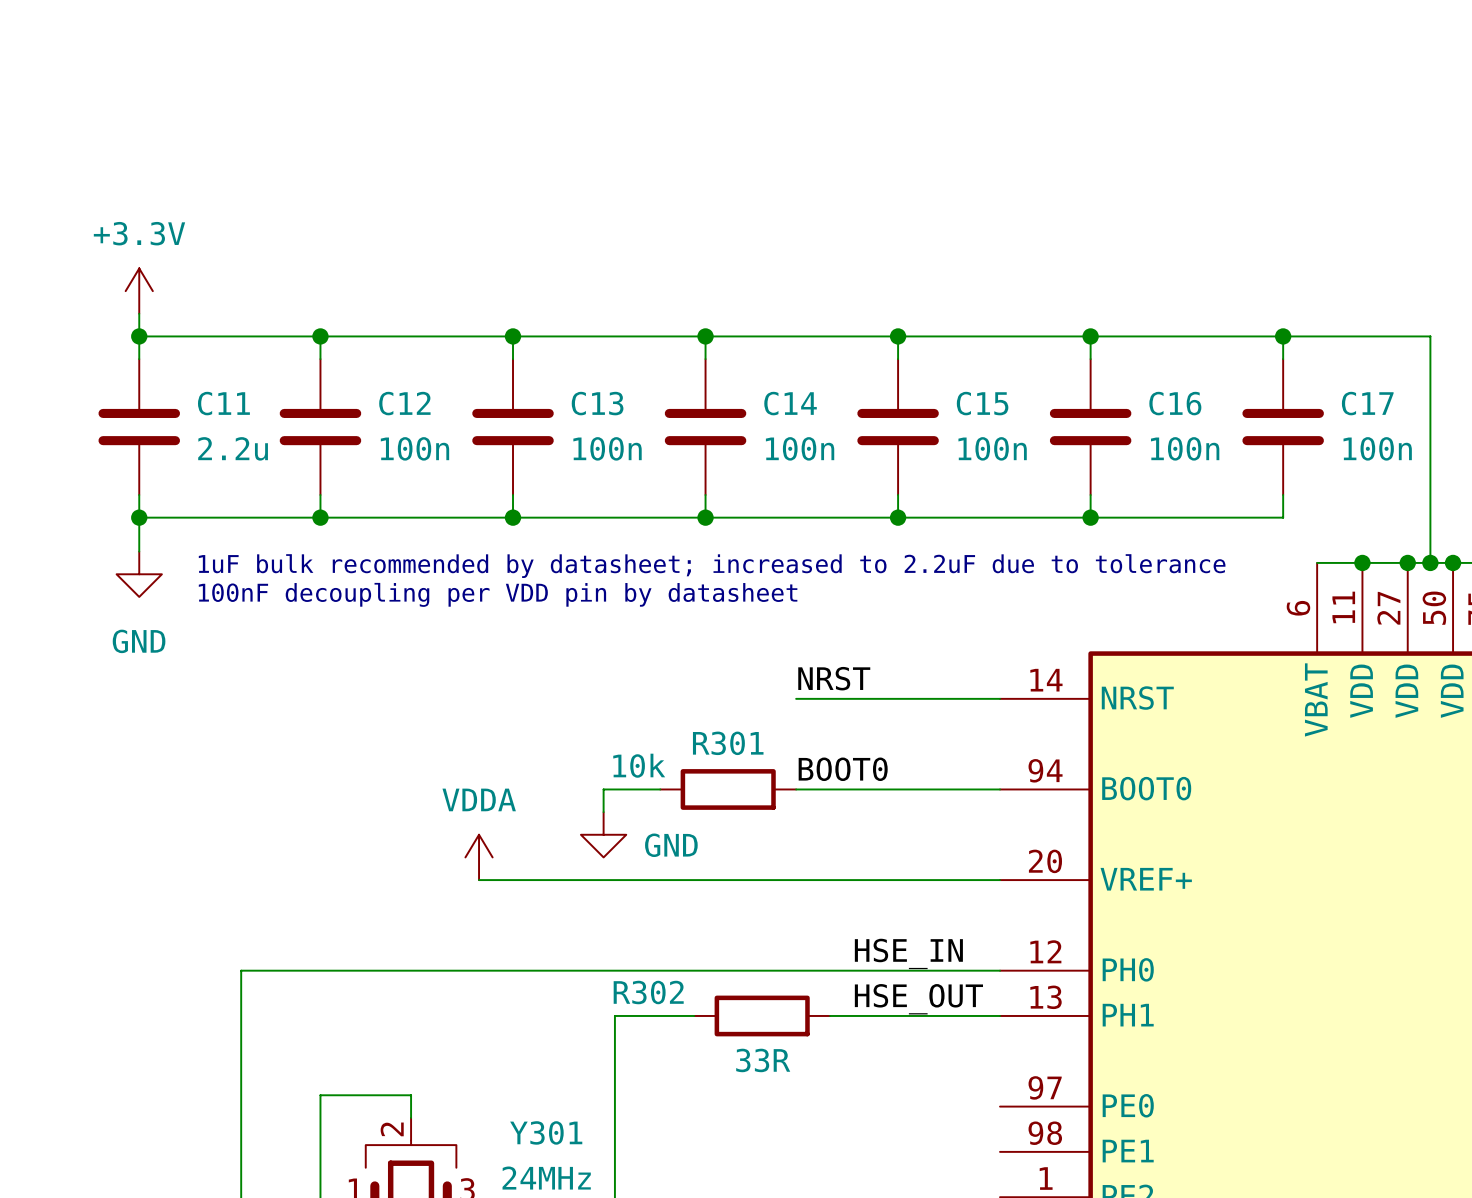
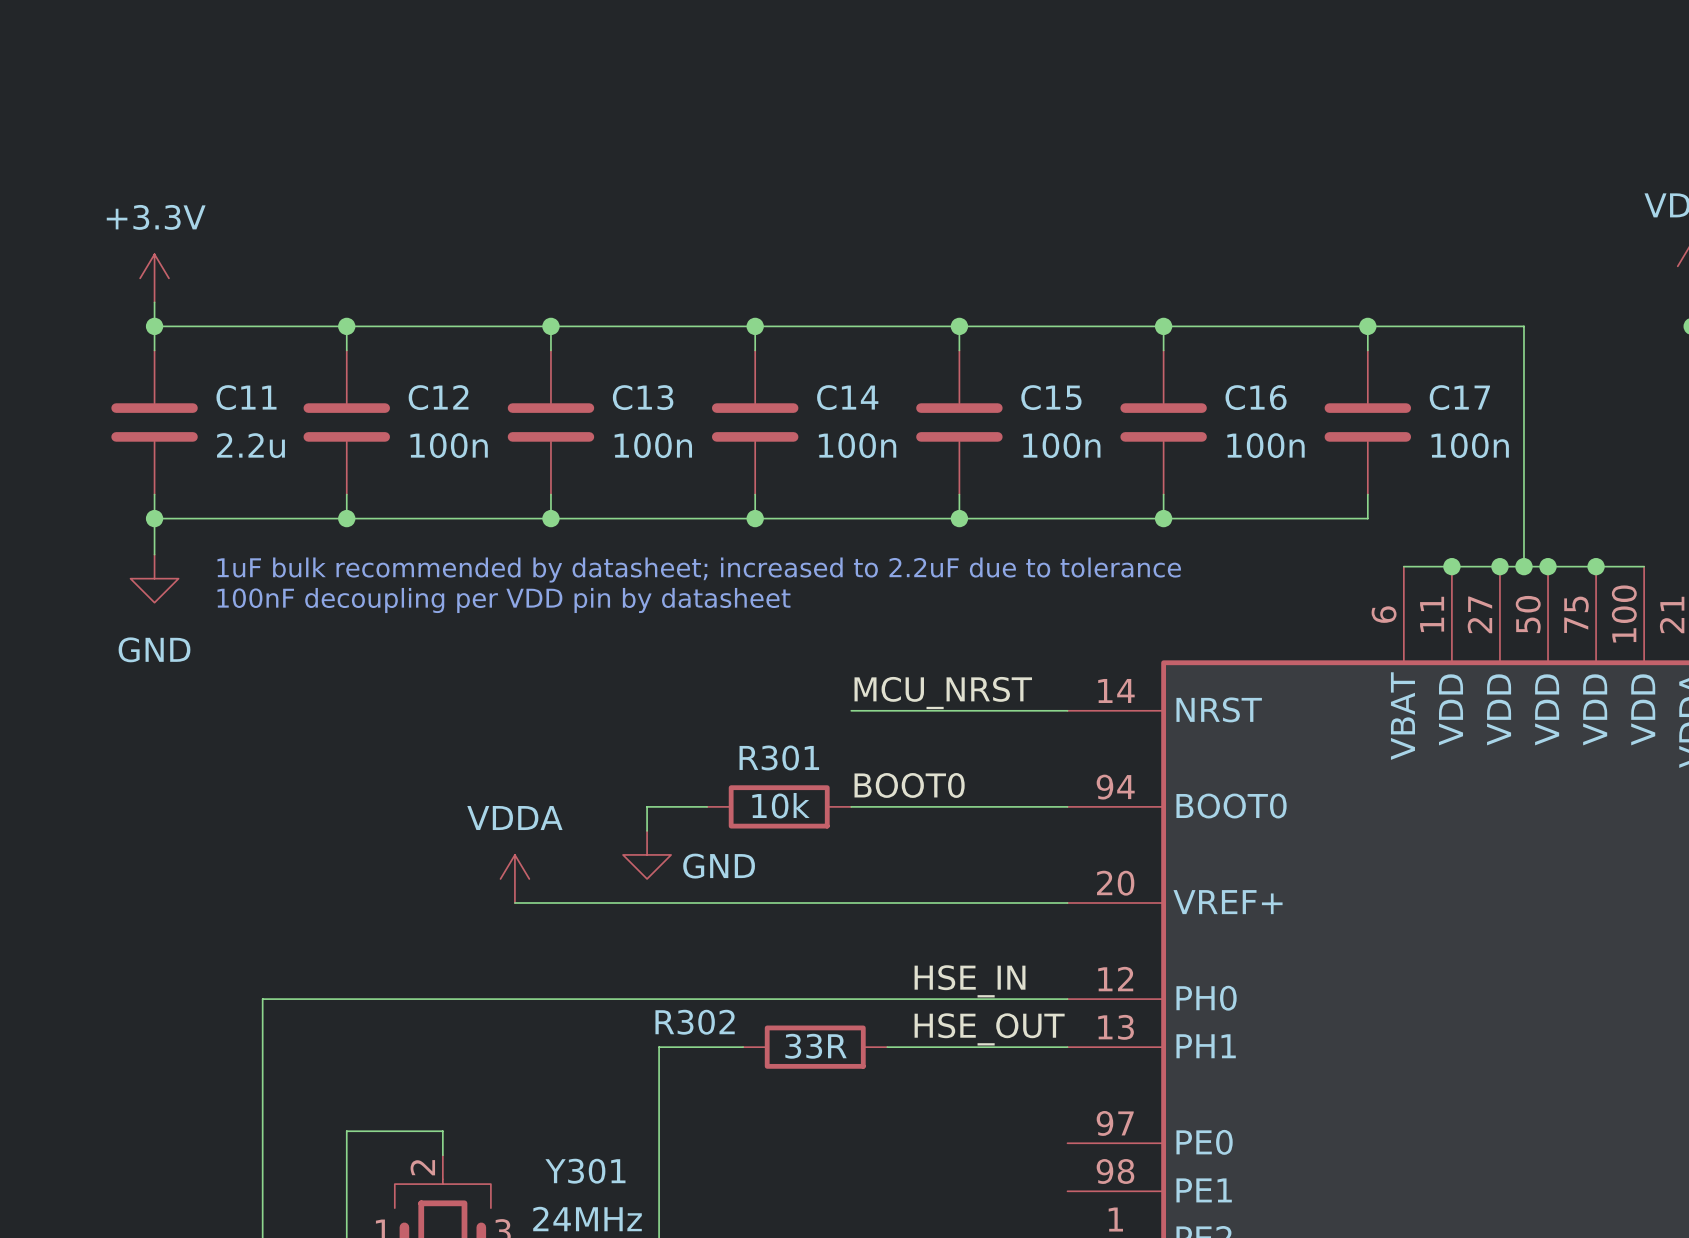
label: NRST (834, 678) -> MCU_NRST (943, 693)
R301 value position: 10k (639, 765) -> 10k (780, 805)
R302 value position: 33R (763, 1060) -> 33R (816, 1046)

